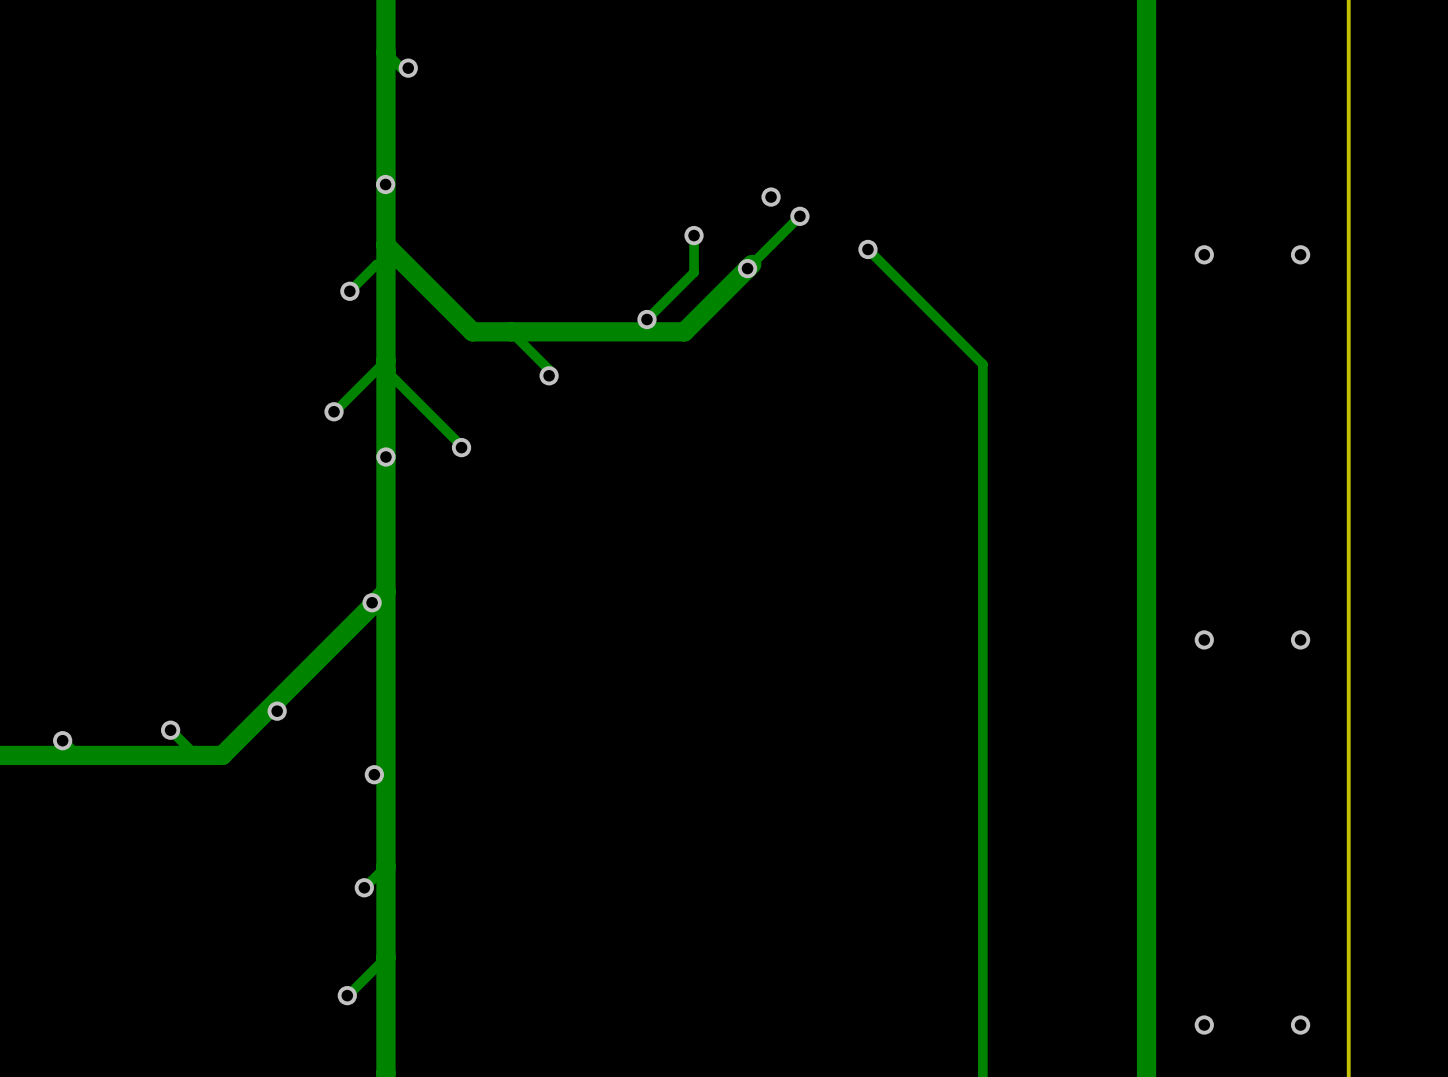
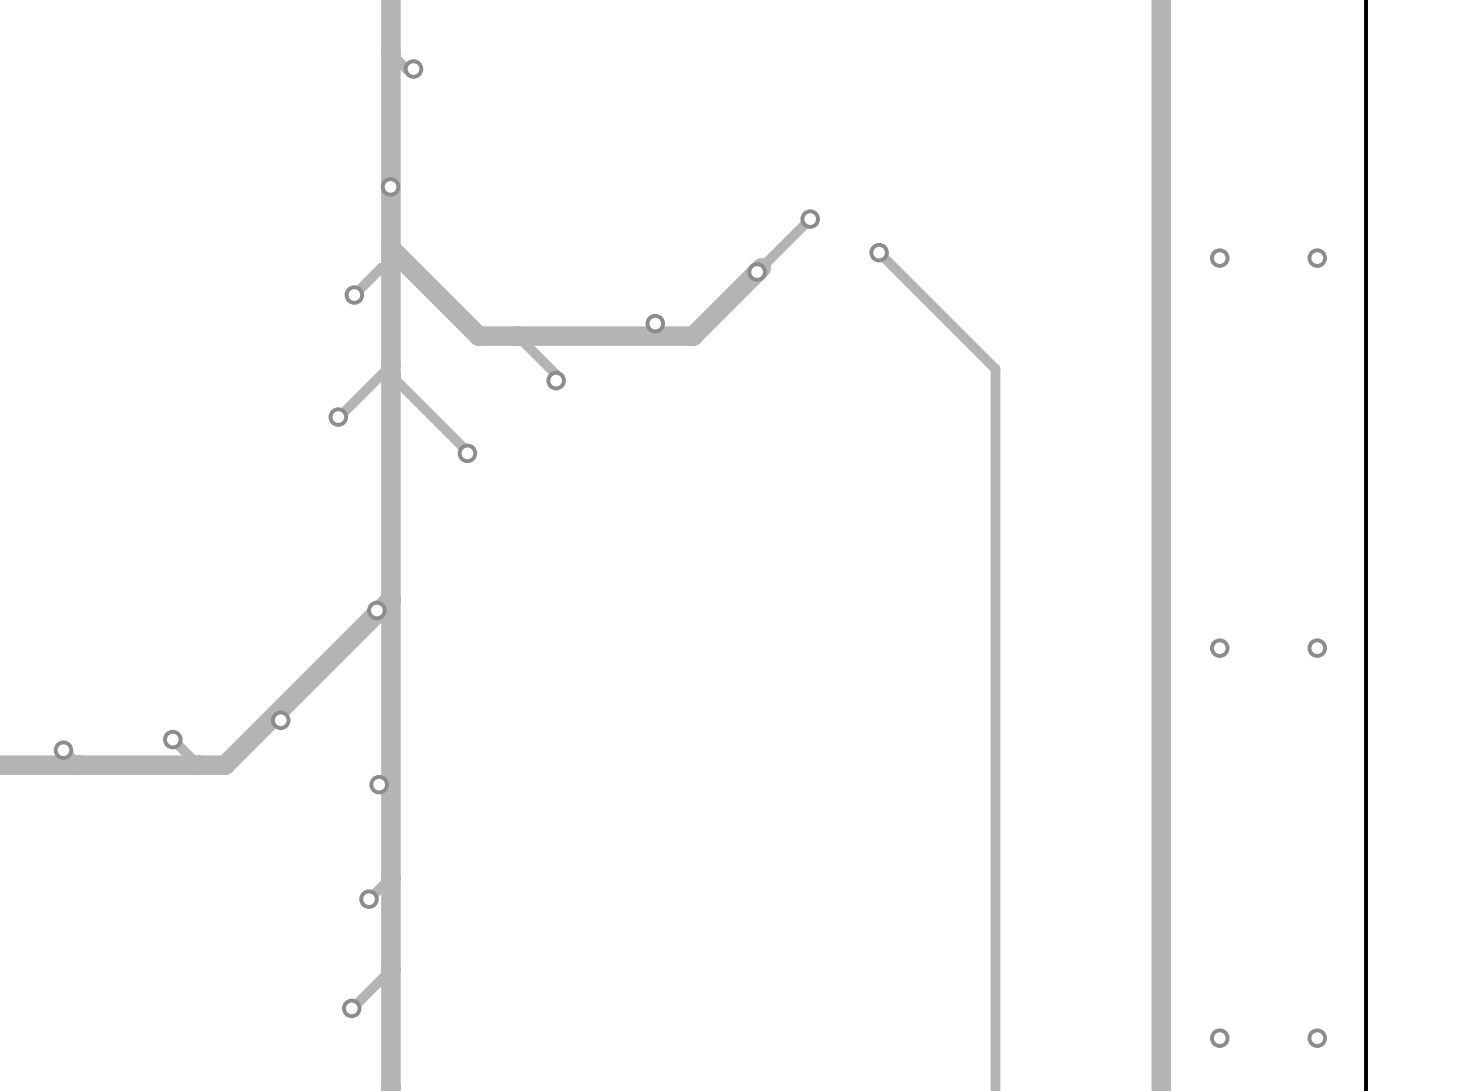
via: (771, 197) -> none
track: (694, 235) (694, 272) (646, 319) -> none
via: (694, 235) -> none
via: (385, 457) -> none

